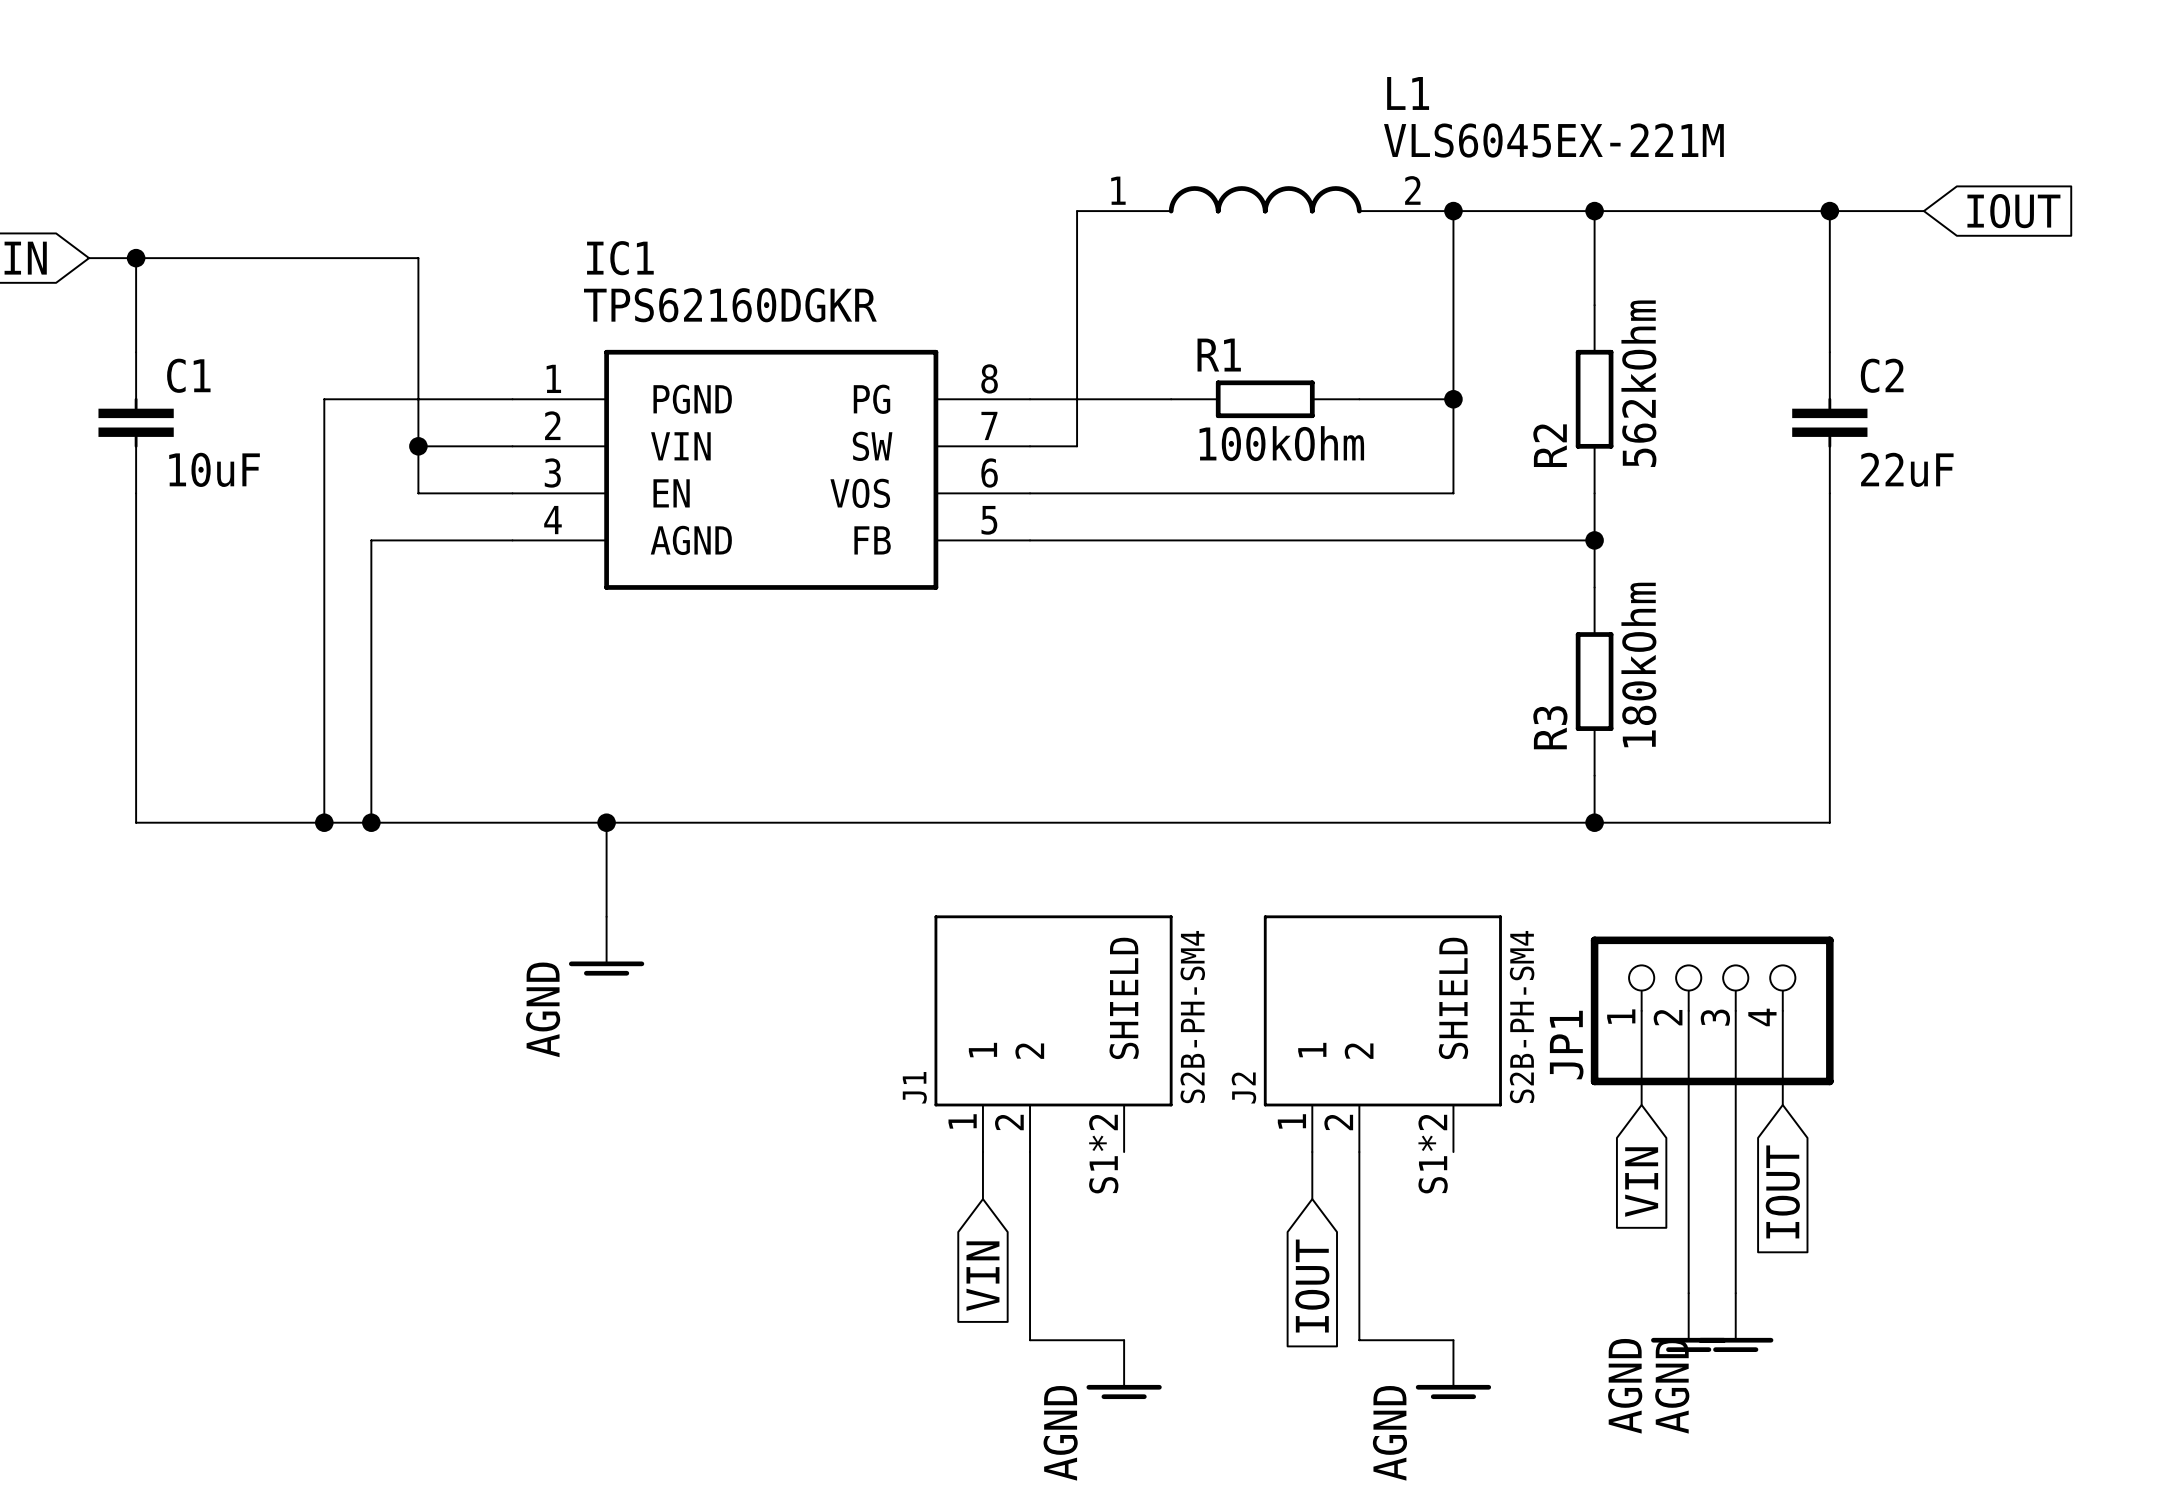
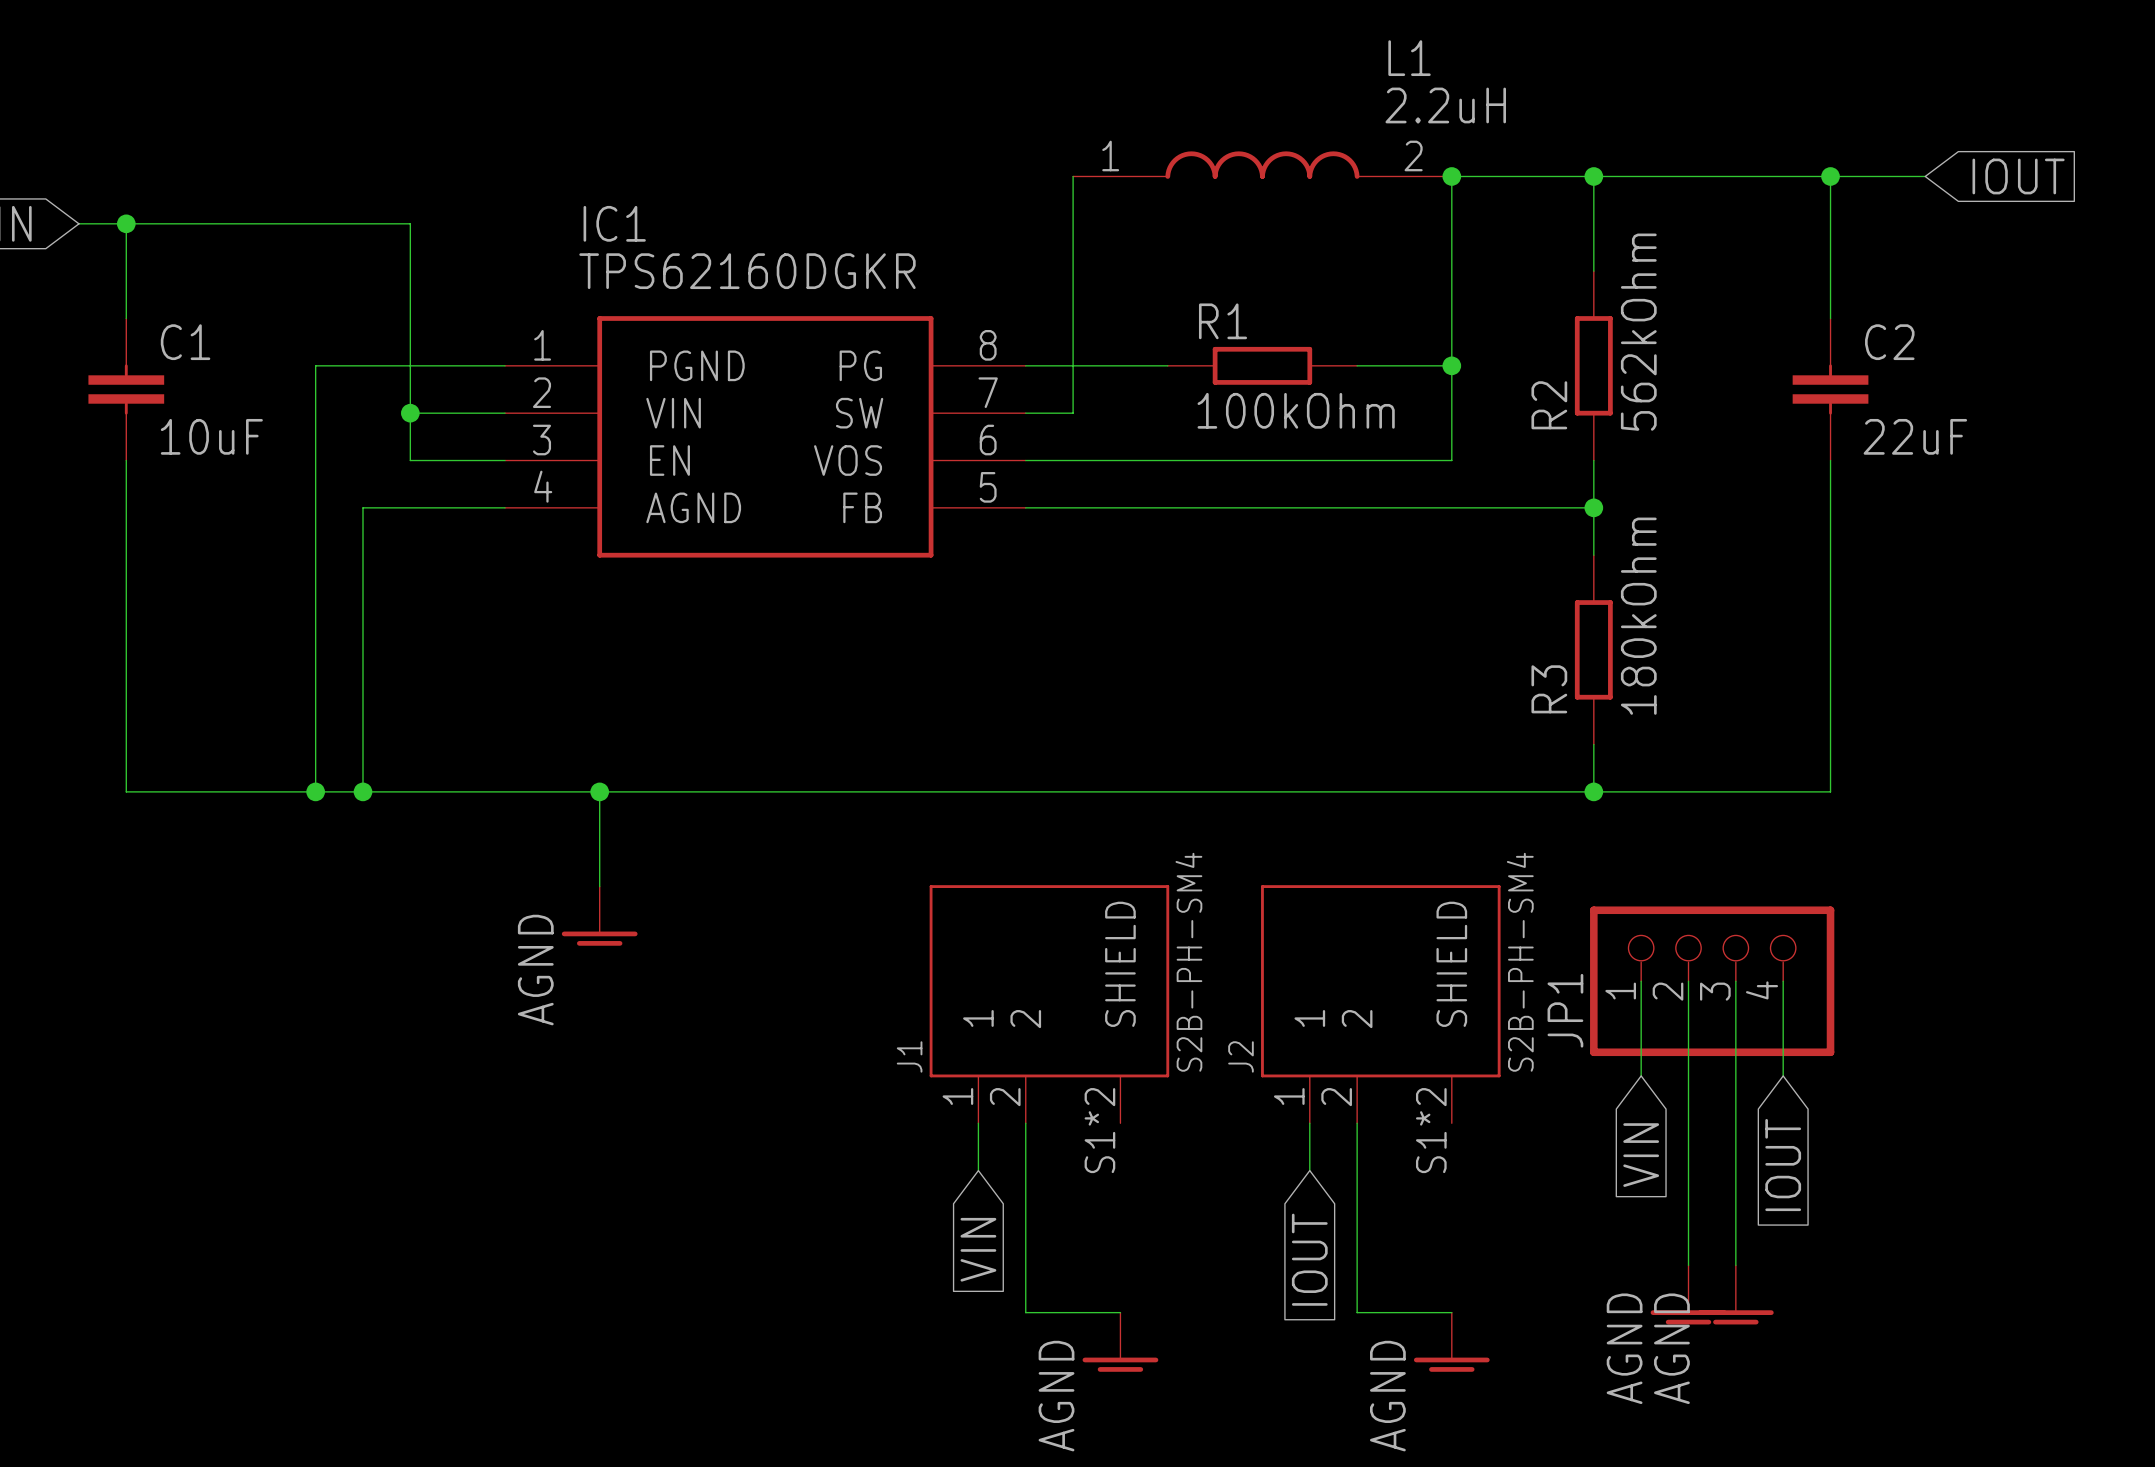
L1 value: VLS6045EX-221M (1553, 140) -> 2.2uH (1445, 105)

